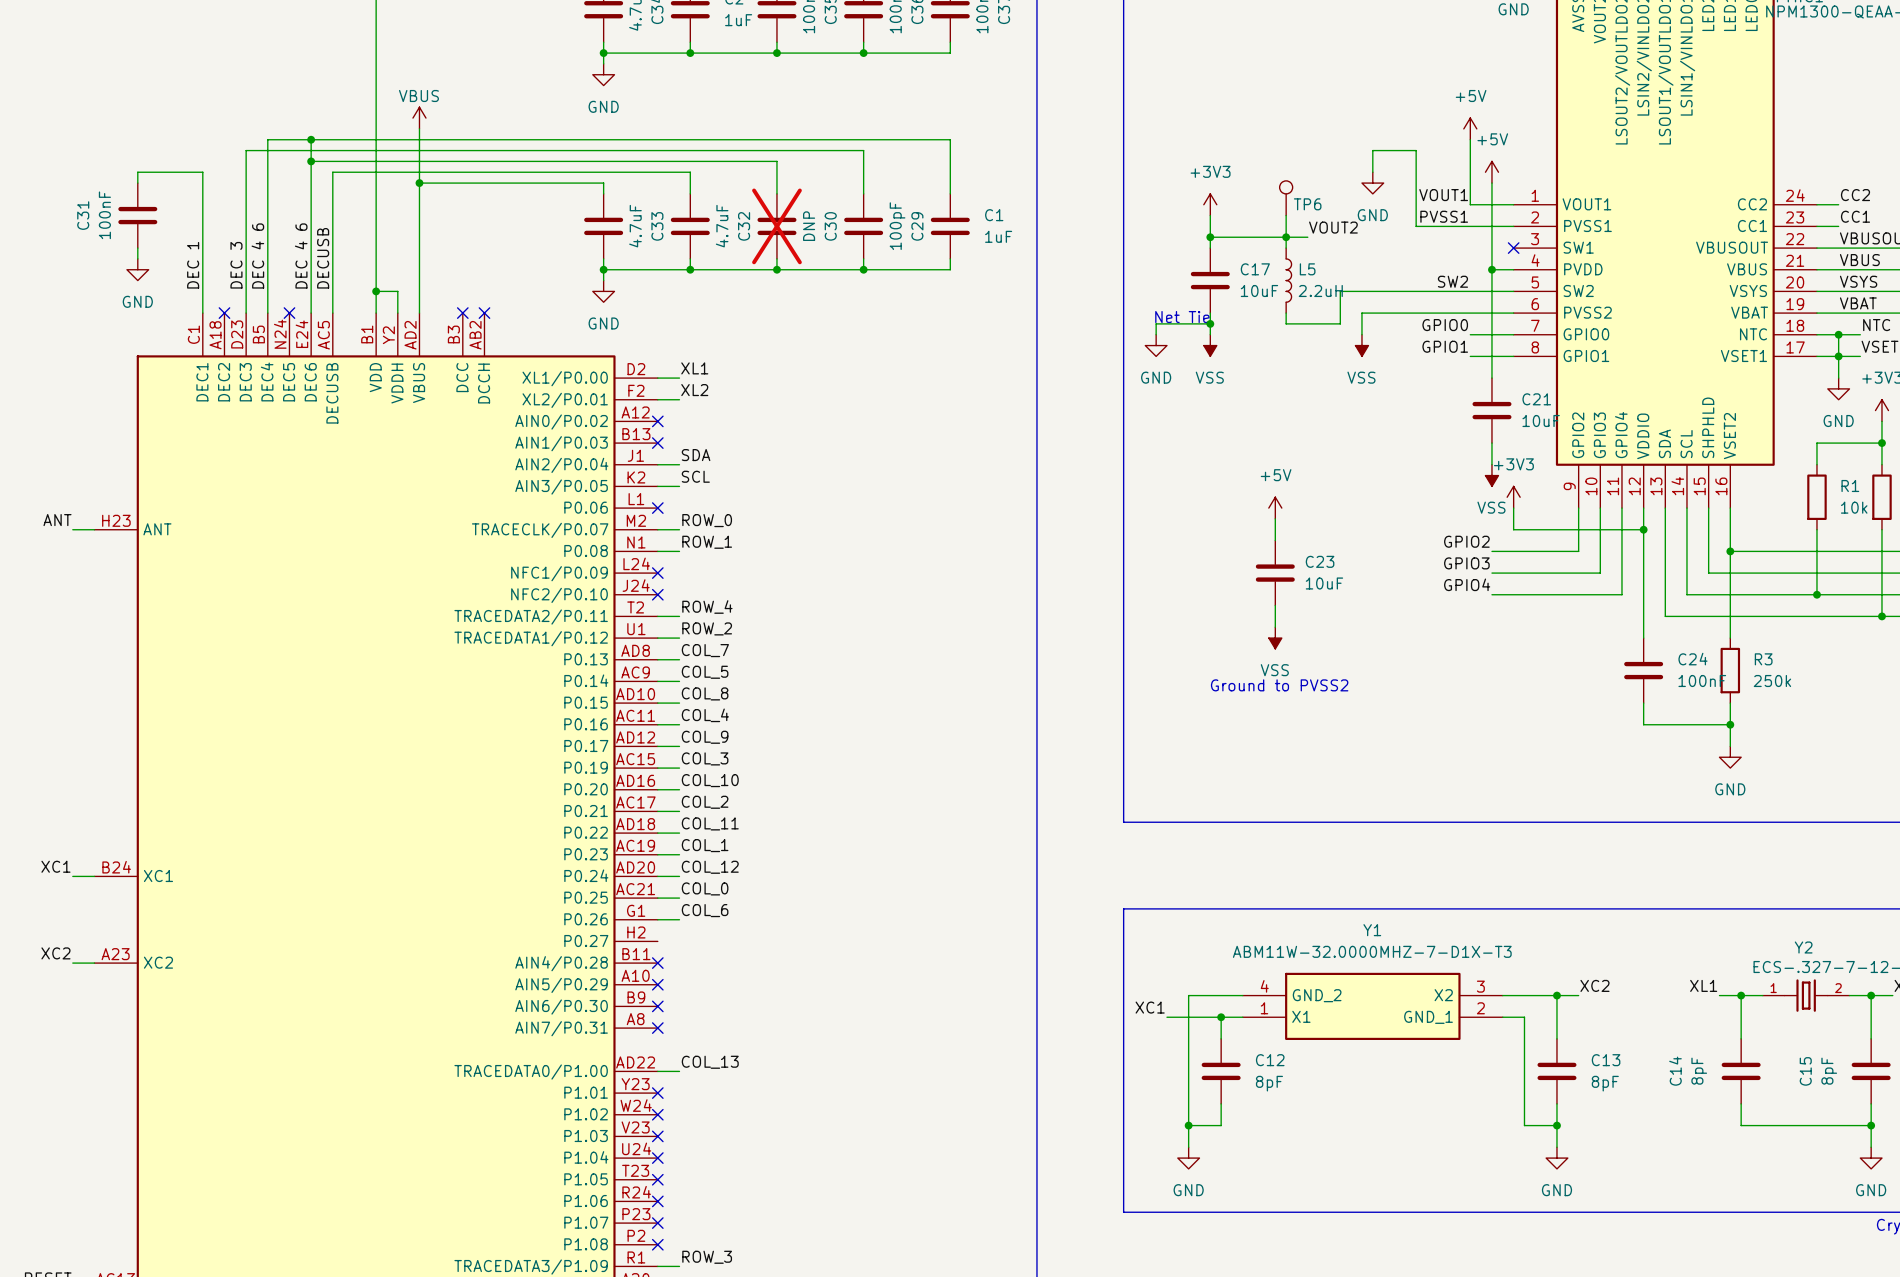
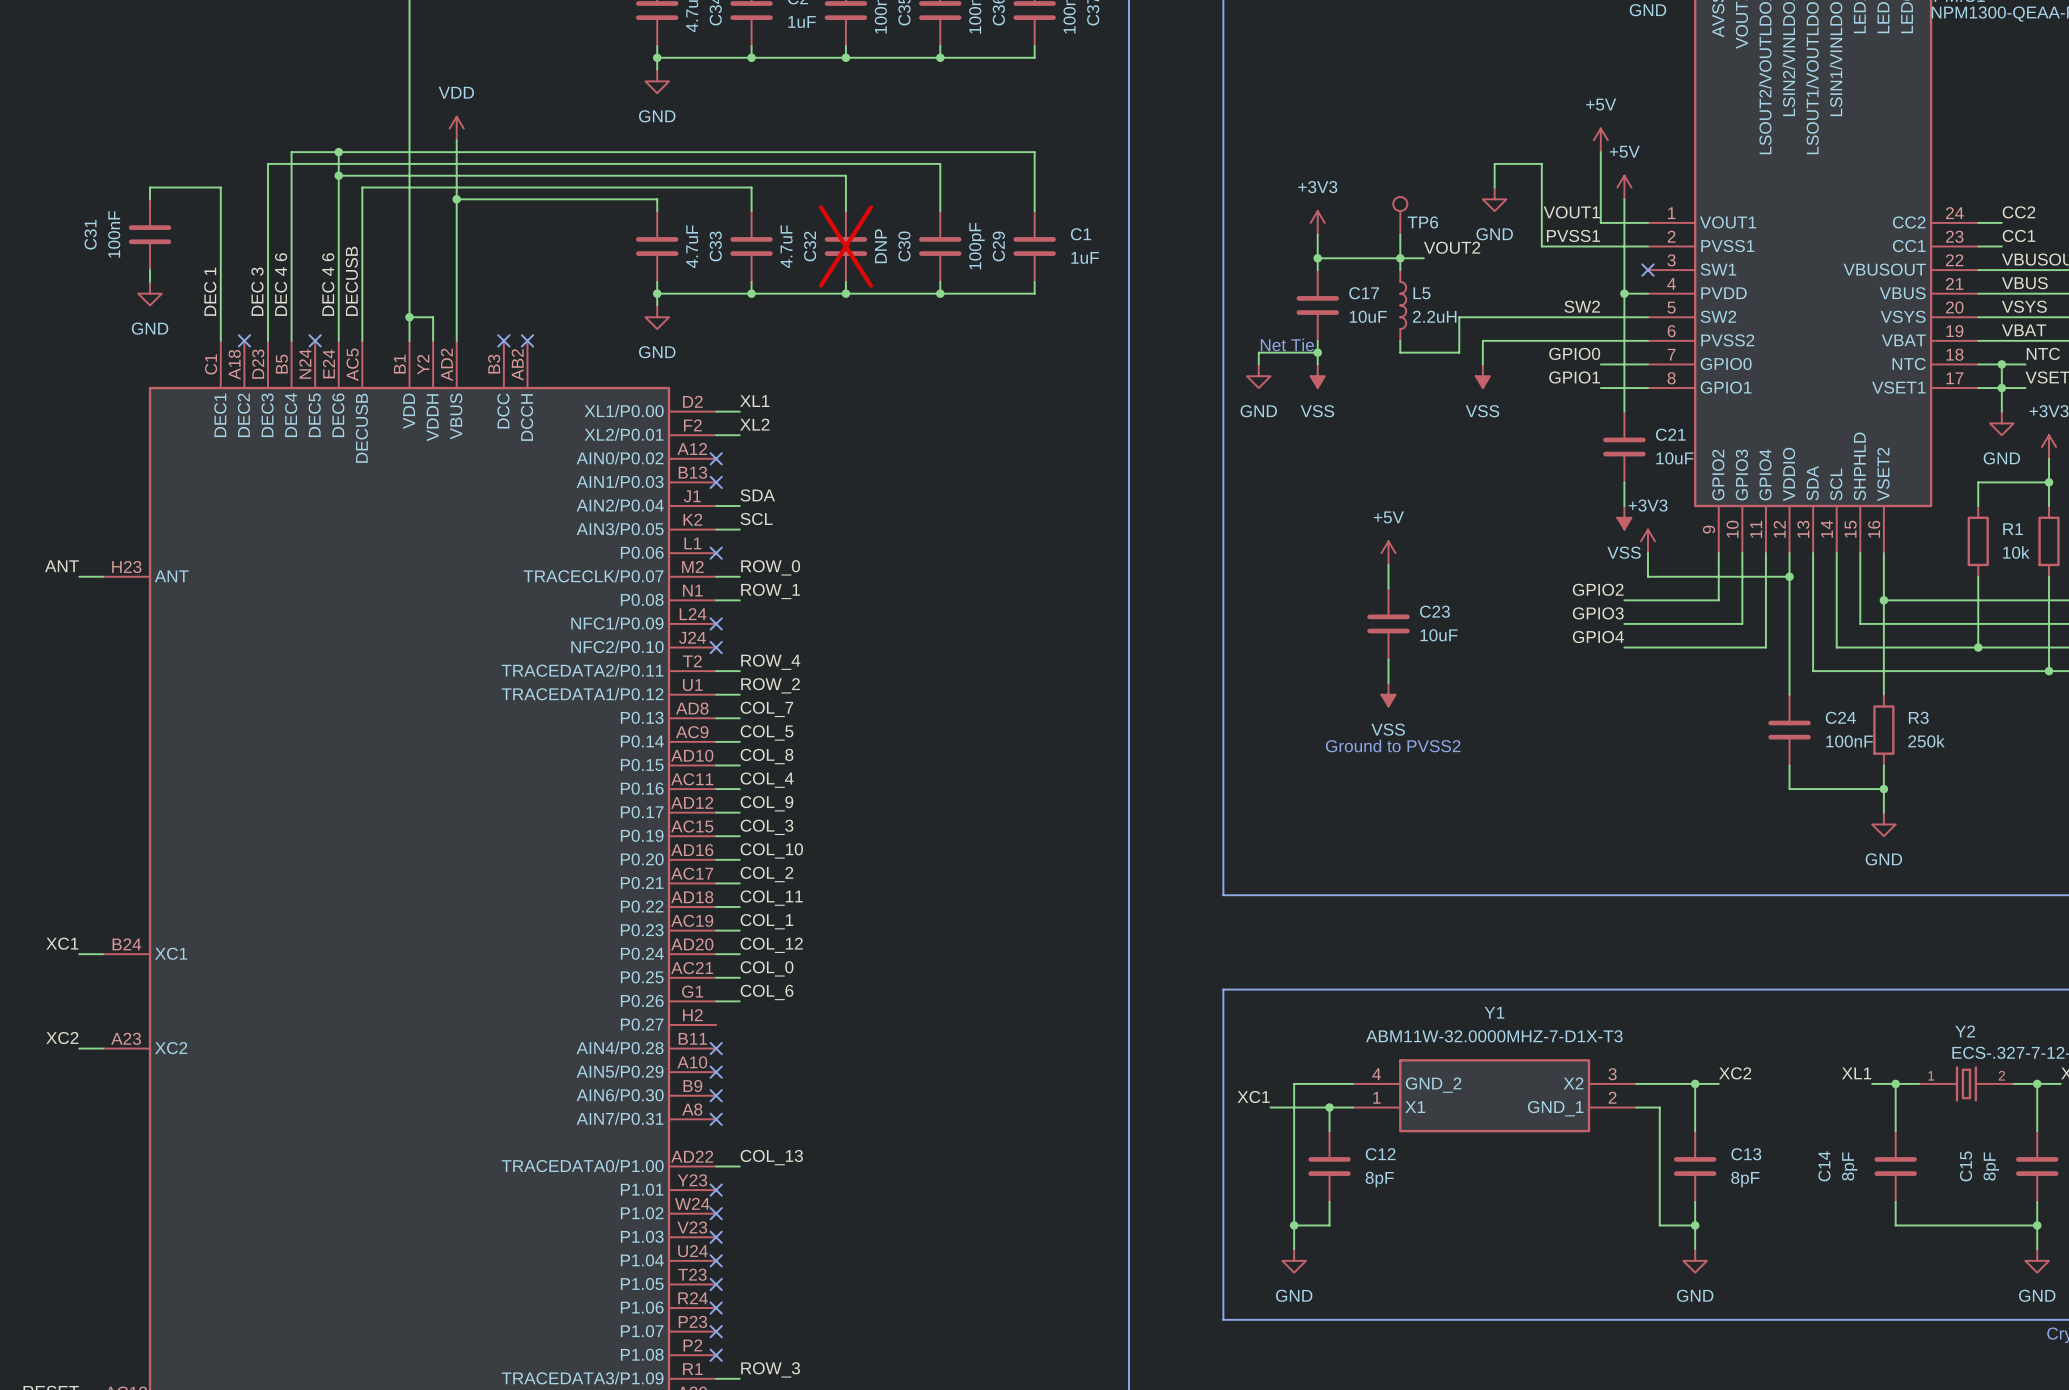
power symbol: VBUS (419, 118) -> VDD (456, 128)

